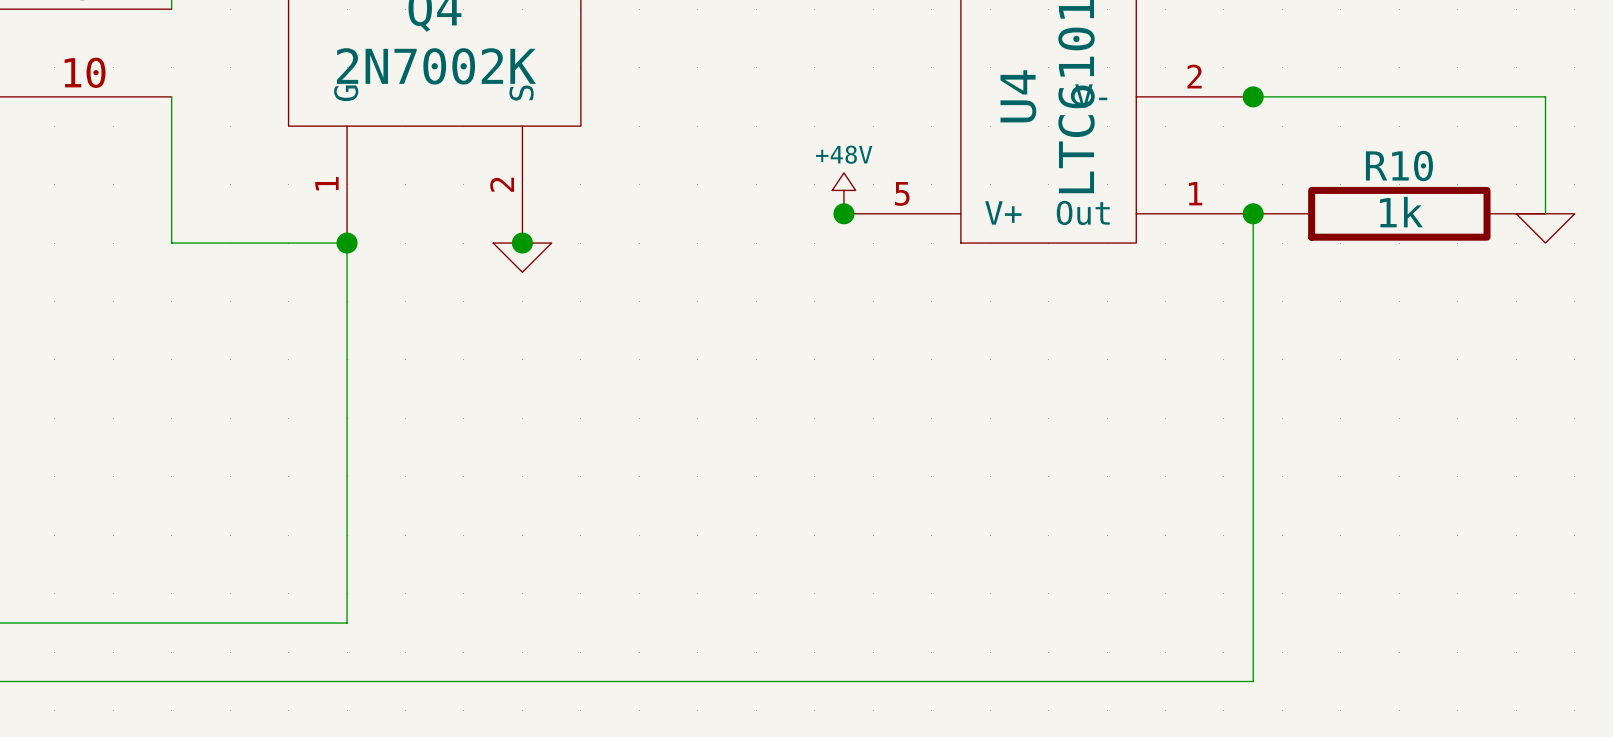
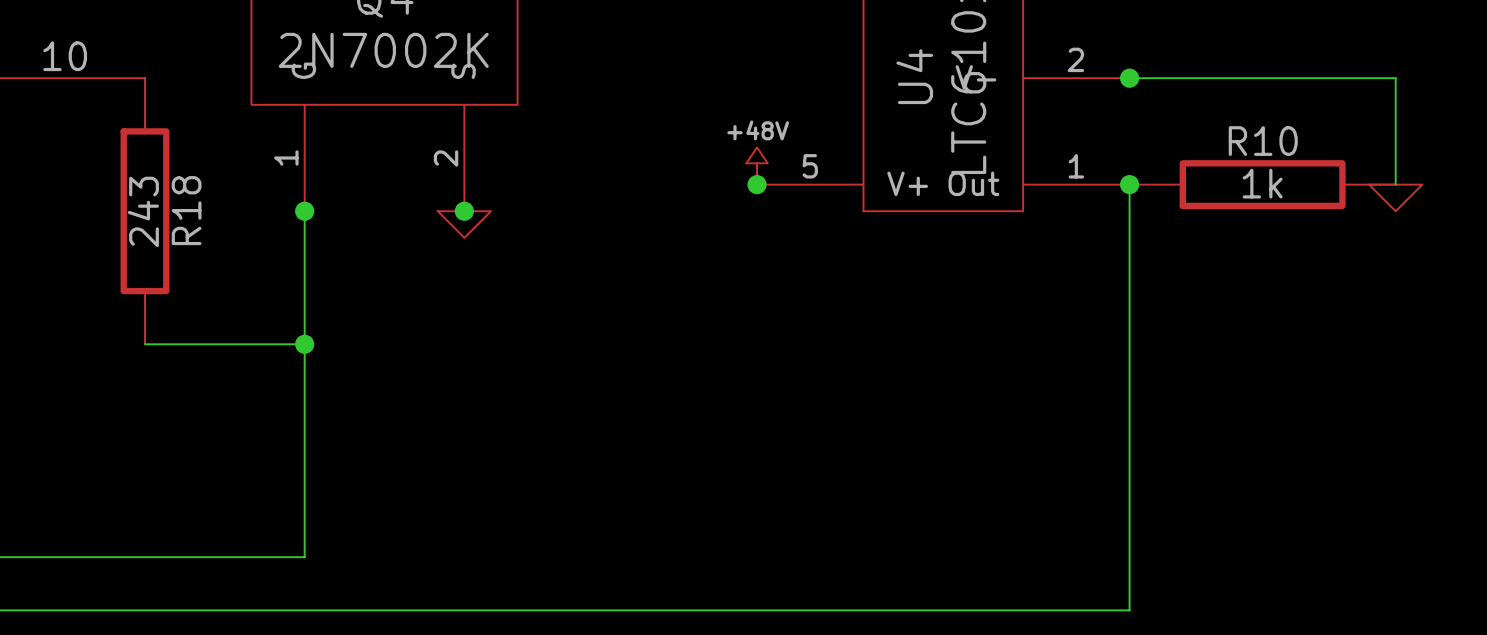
wire: (171, 96) (171, 243) (347, 243) -> none
R18: none -> 243 (145, 211)
wire: none -> (145, 344) (304, 344)
junction: none -> (304, 344)

